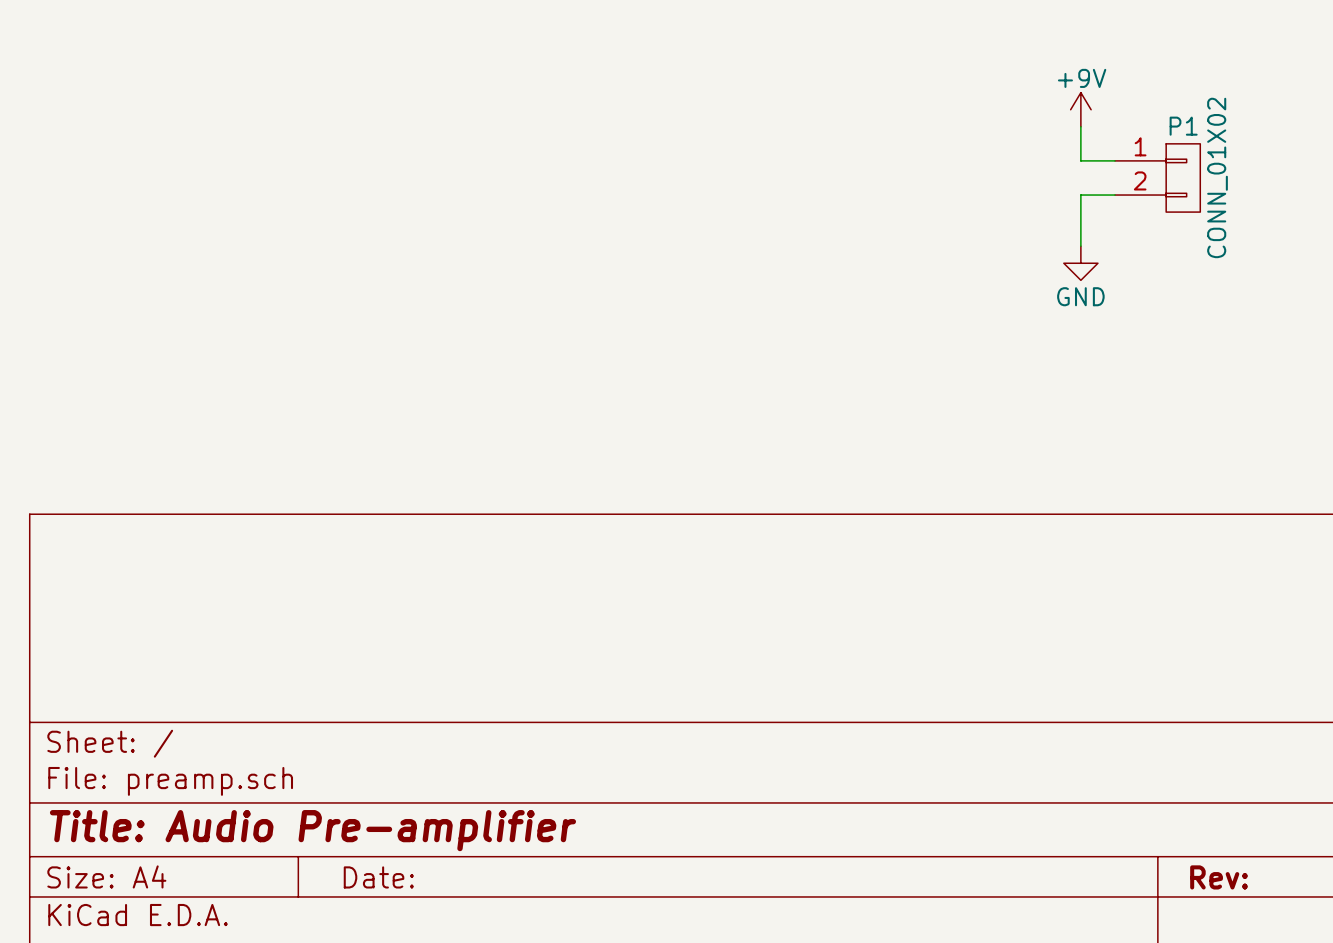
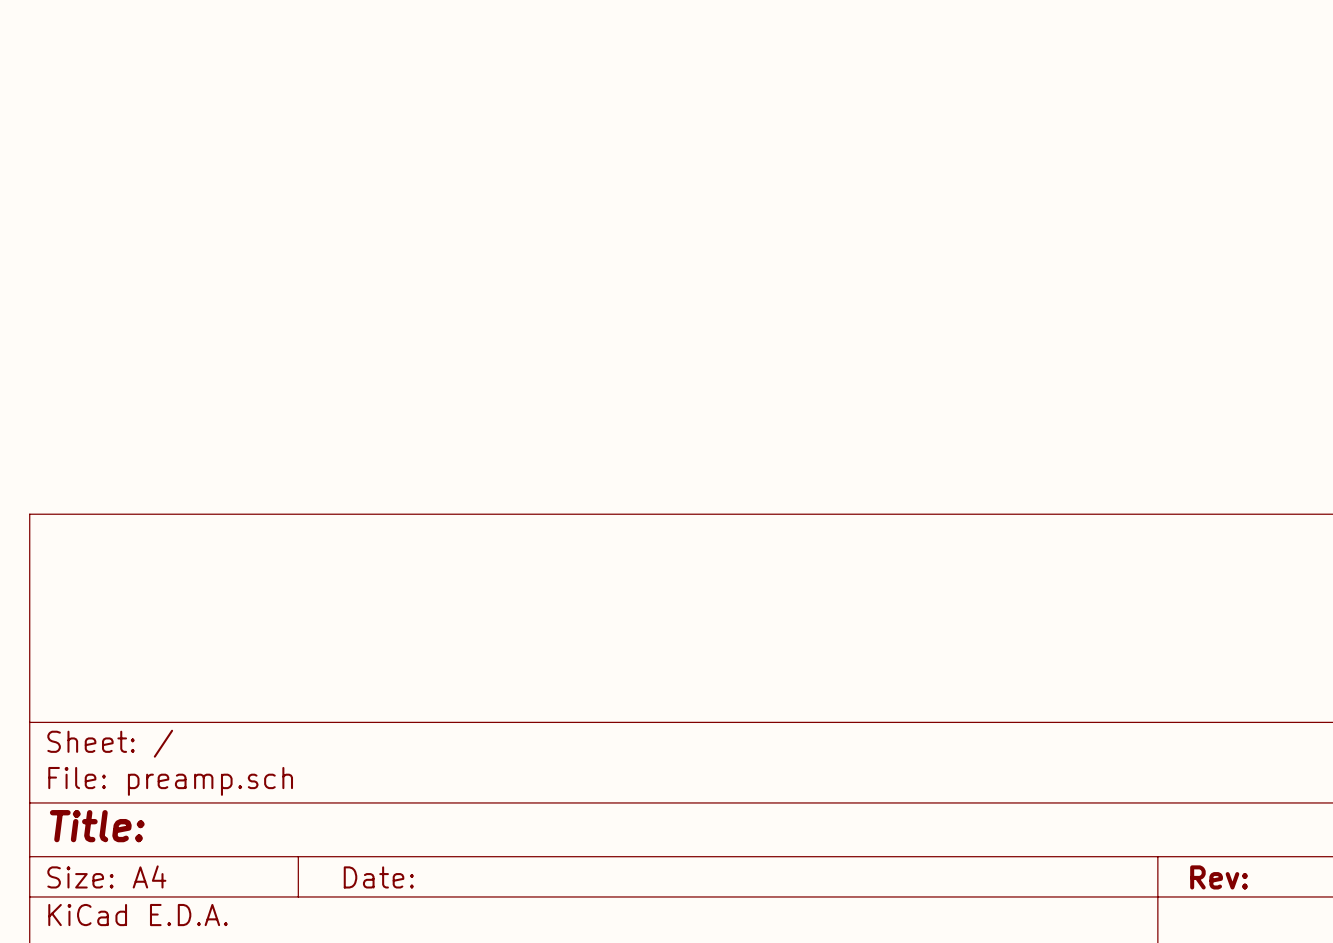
power symbol: +9V (1080, 109) -> none
wire: (1080, 126) (1080, 160) (1115, 160) -> none
P1: CONN_01X02 (1157, 177) -> none
wire: (1115, 195) (1080, 195) (1080, 246) -> none
power symbol: GND (1080, 263) -> none
title block: Title: Audio Pre-amplifier (312, 830) -> Title: (97, 826)

